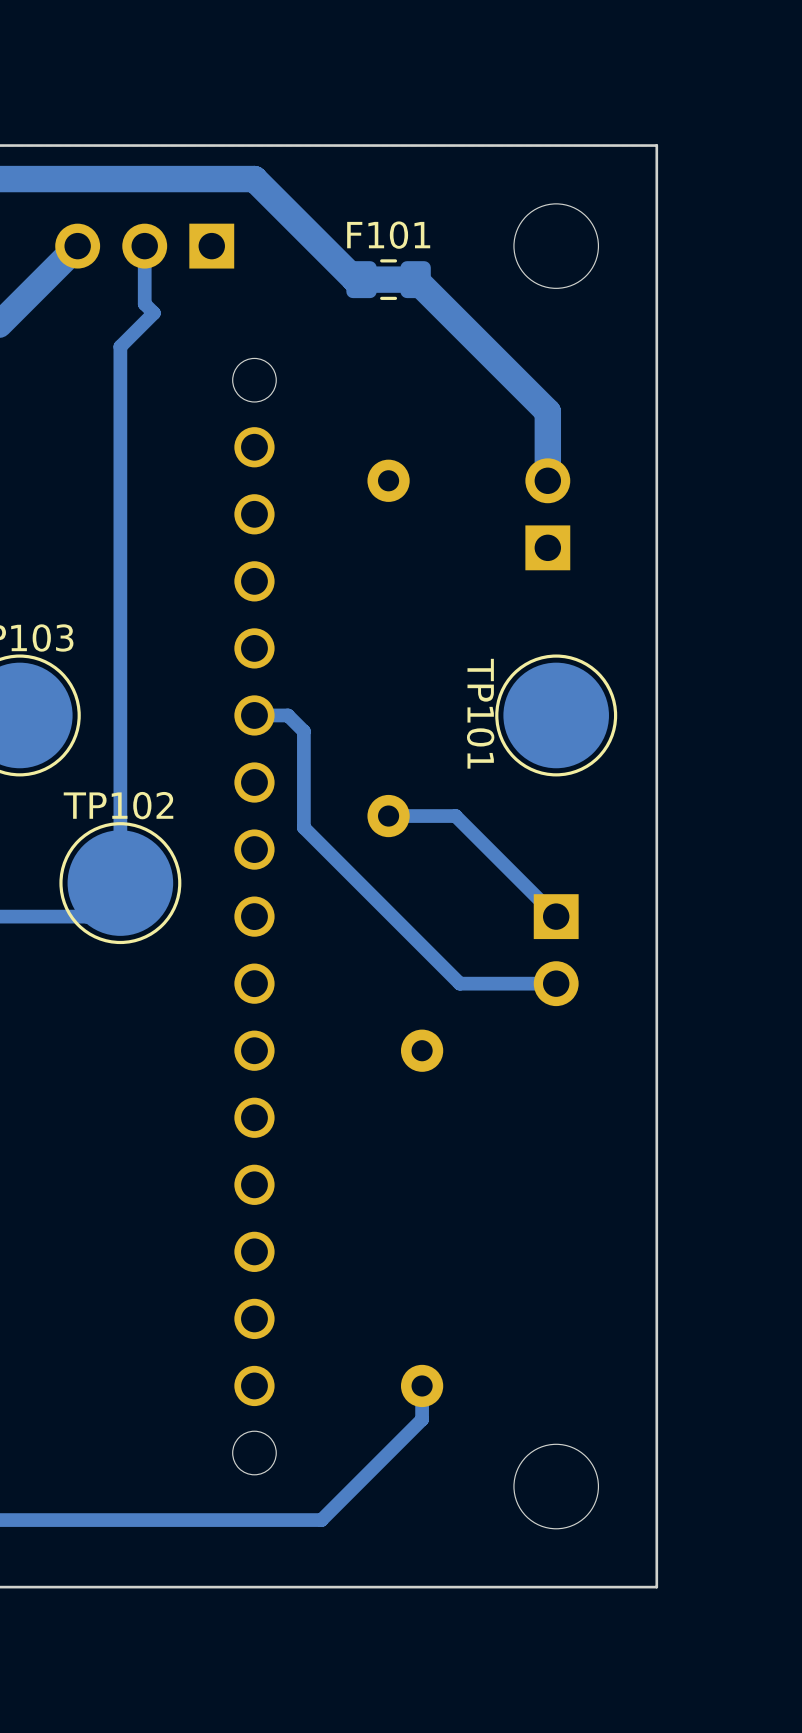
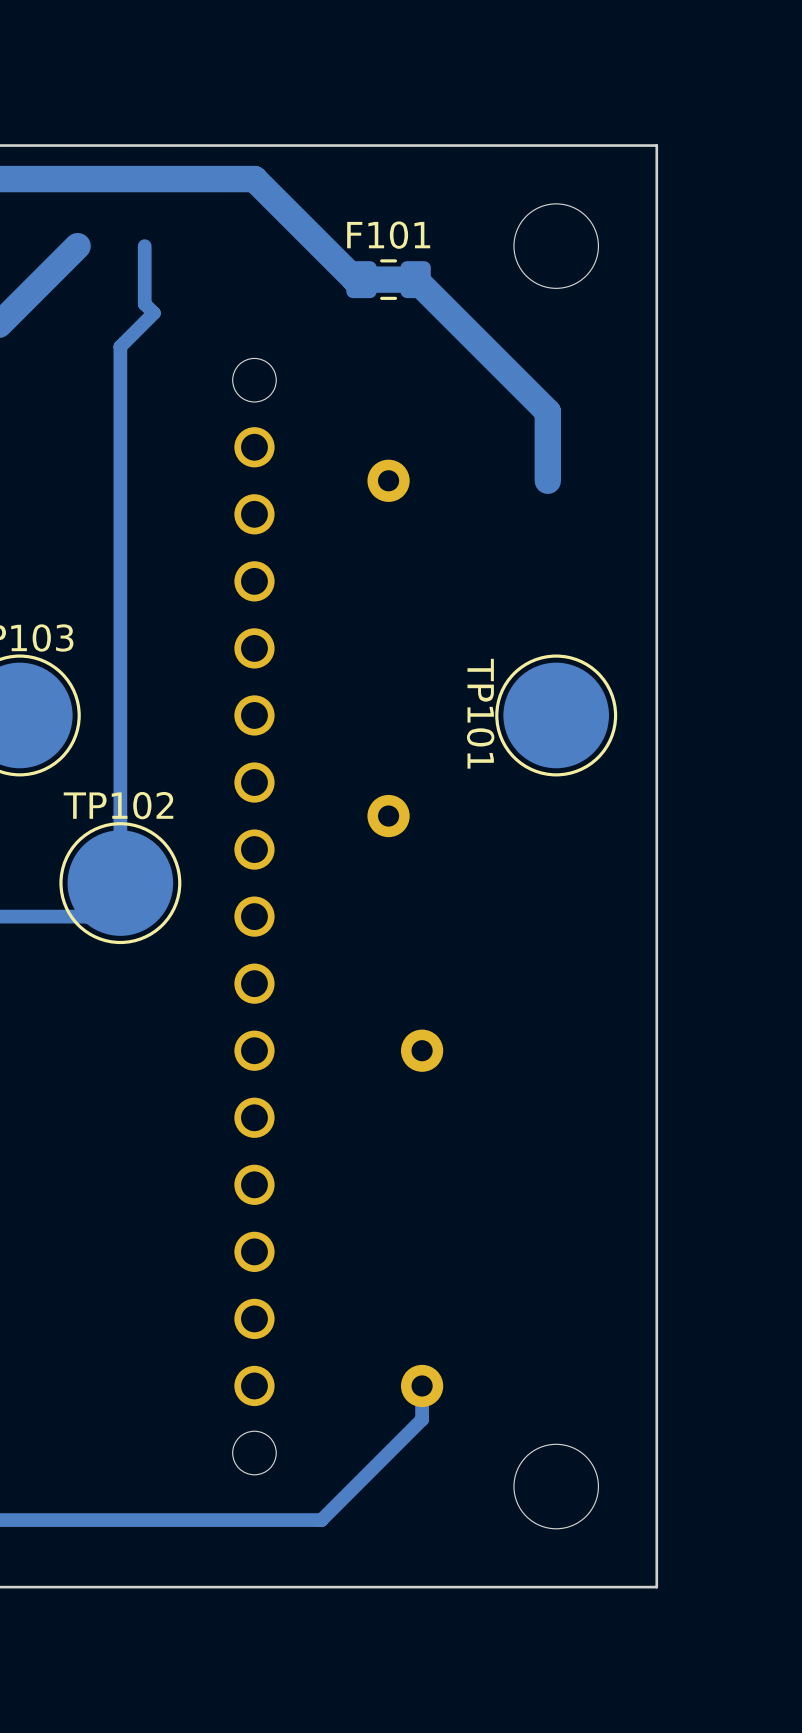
part: (144, 246) -> none
part: (547, 514) -> none
bottom track: (254, 715) (287, 715) (303, 731) (303, 827) (459, 983) (556, 983) -> none
bottom track: (388, 816) (455, 816) (556, 916) -> none
part: (556, 950) -> none

